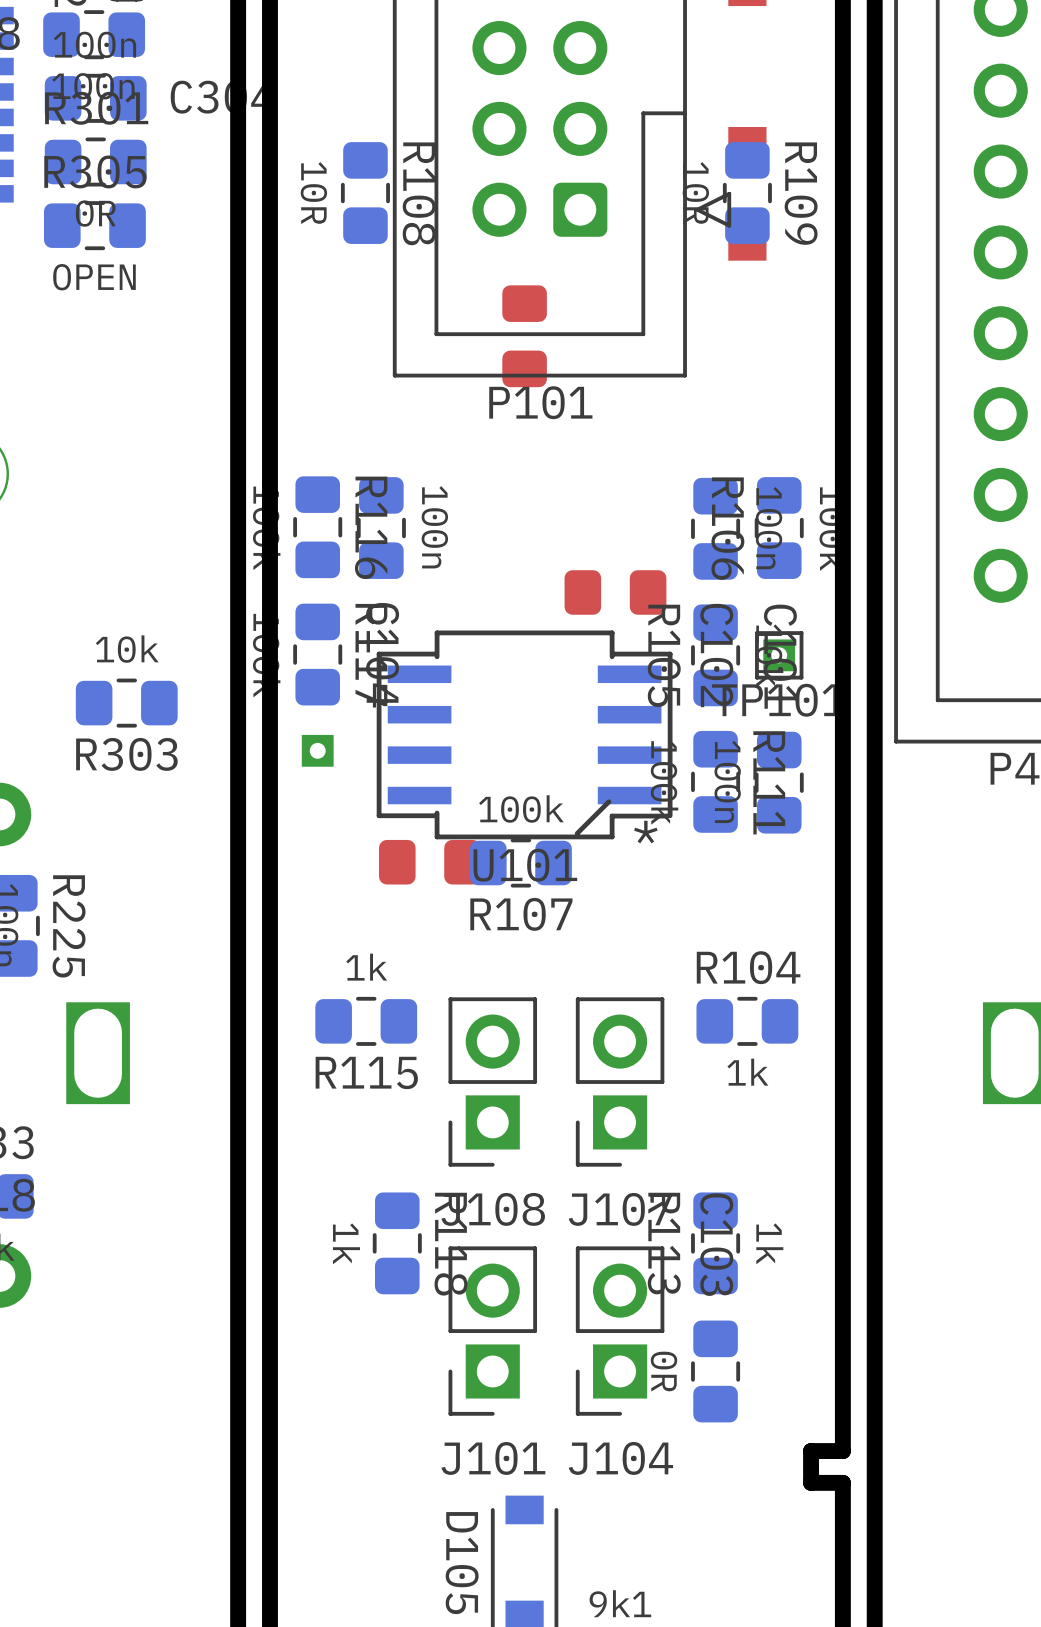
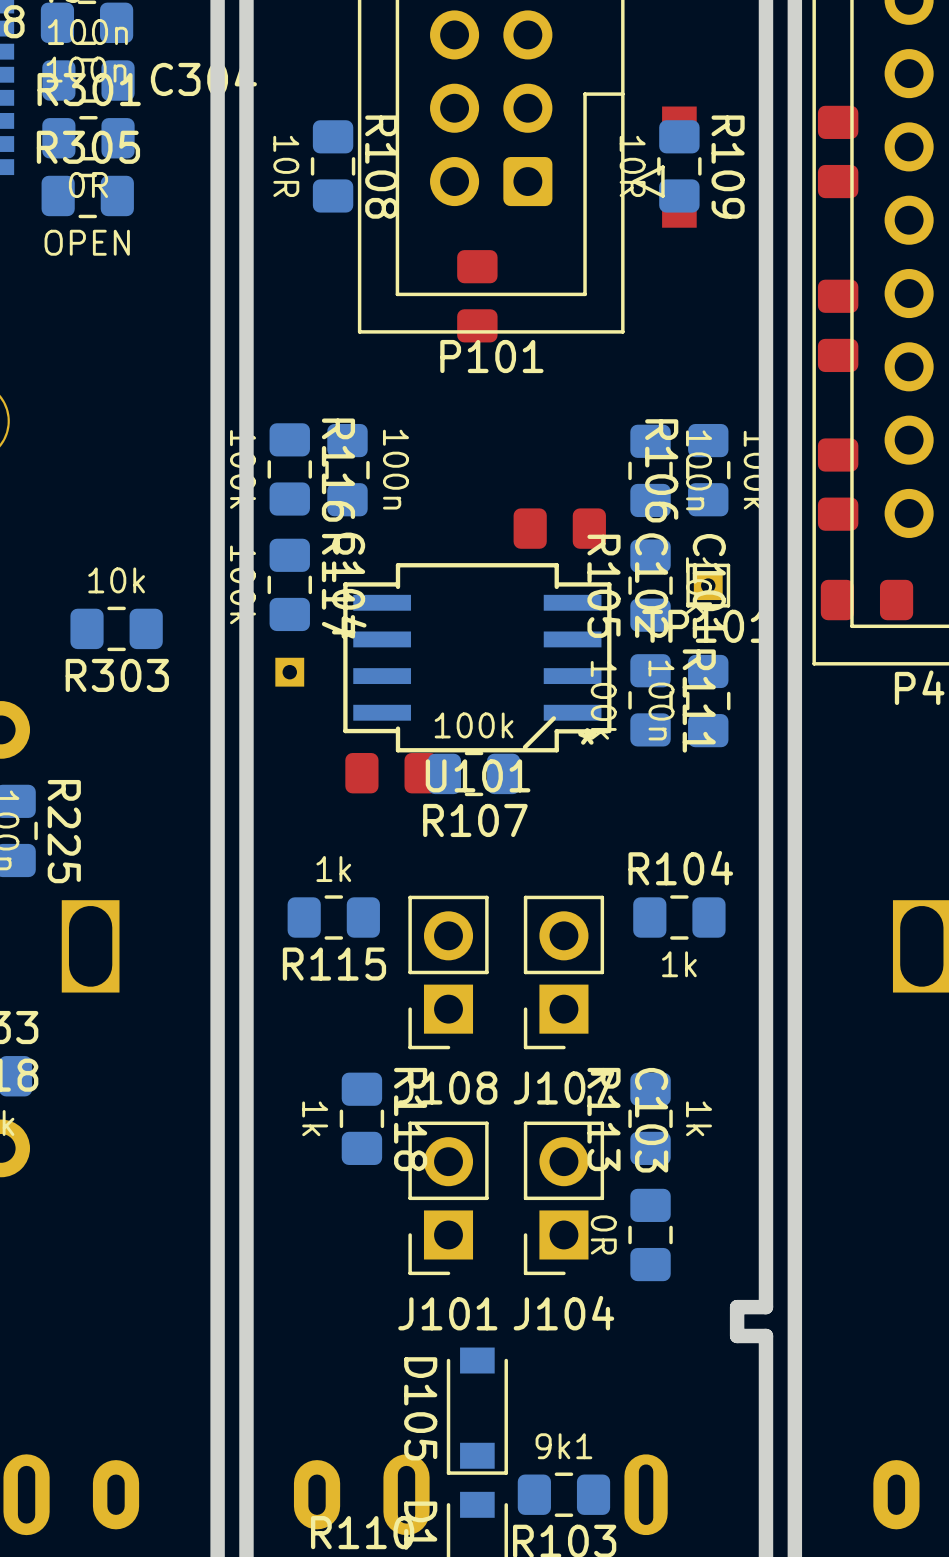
part: none -> (838, 151)
part: none -> (838, 325)
part: none -> (838, 484)
part: none -> (866, 600)

